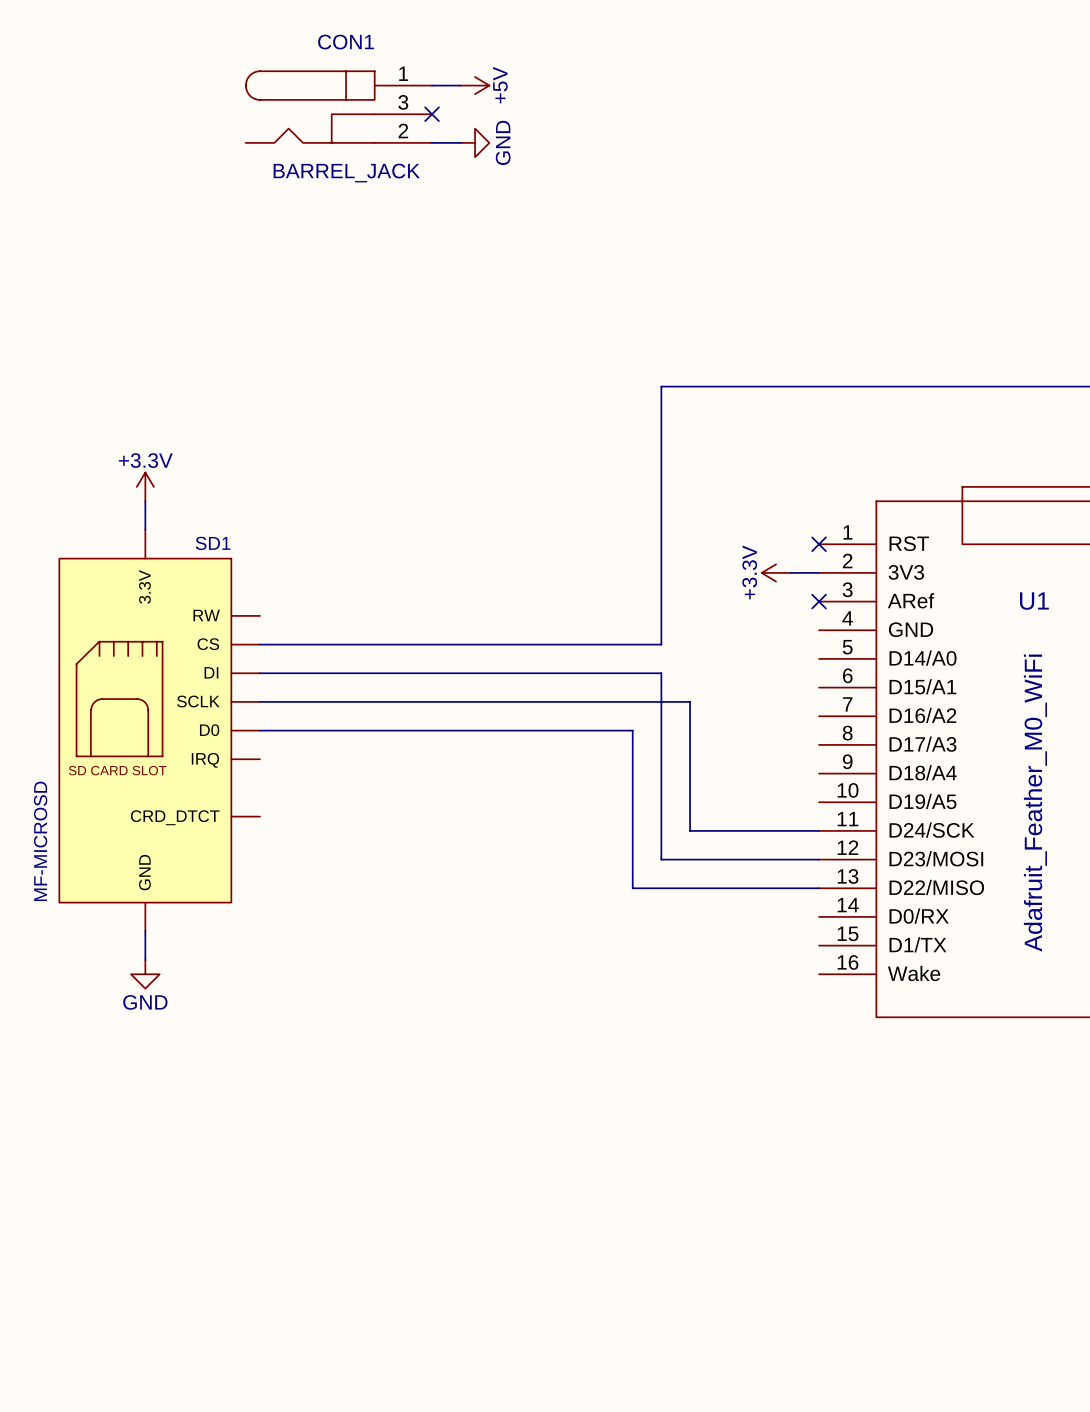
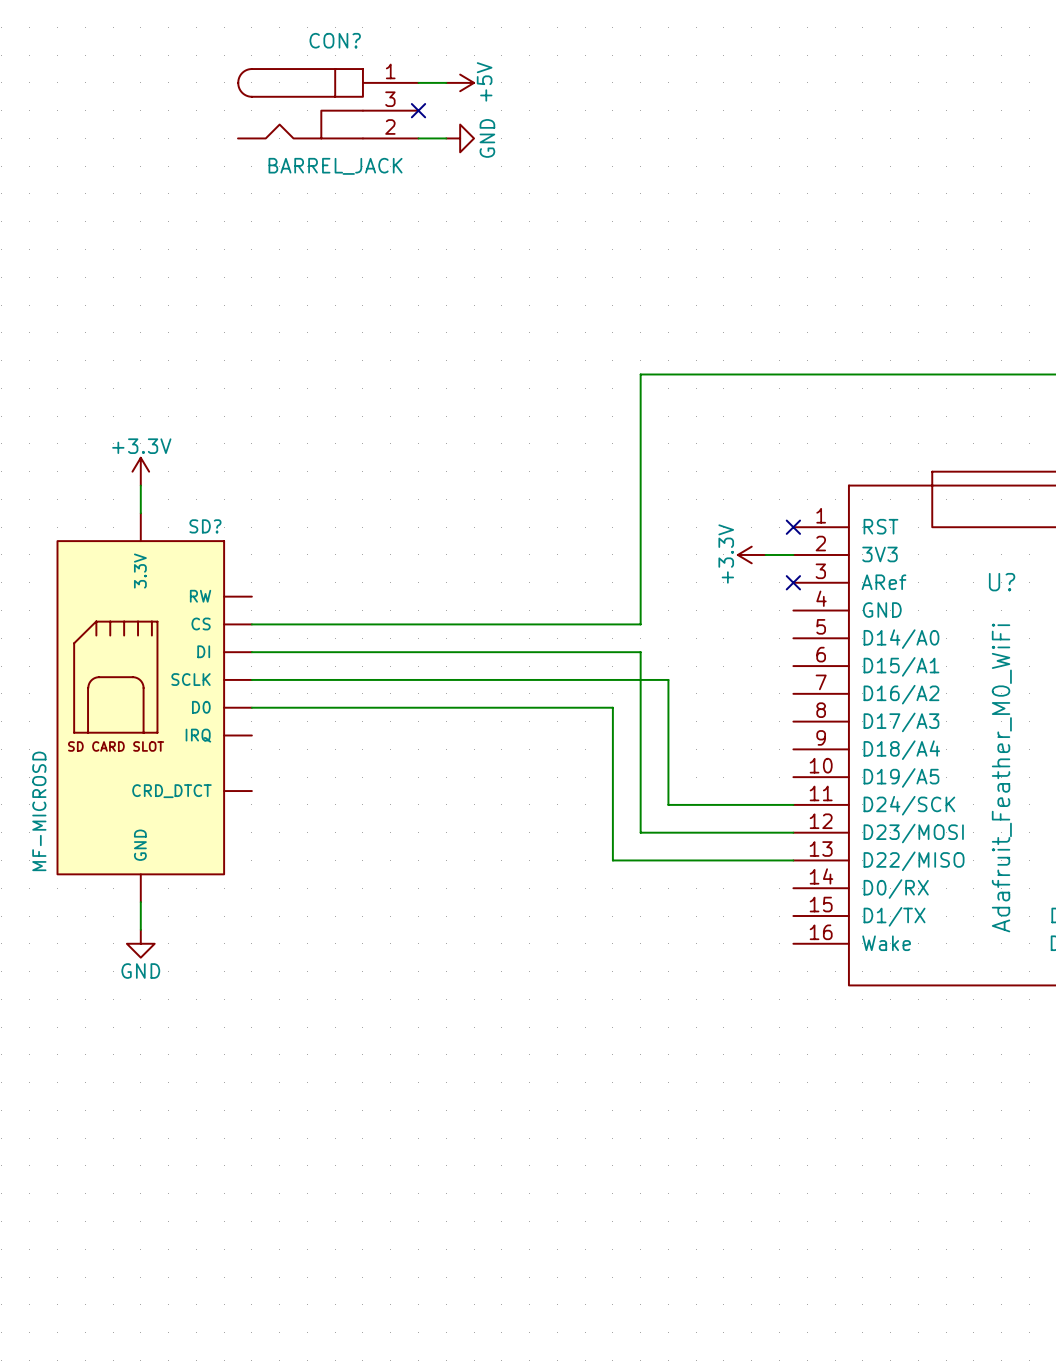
CON1 name: CON1 (346, 42) -> CON? (335, 40)
SD1 name: SD1 (213, 543) -> SD? (205, 526)
U1 name: U1 (1034, 601) -> U? (1002, 582)

